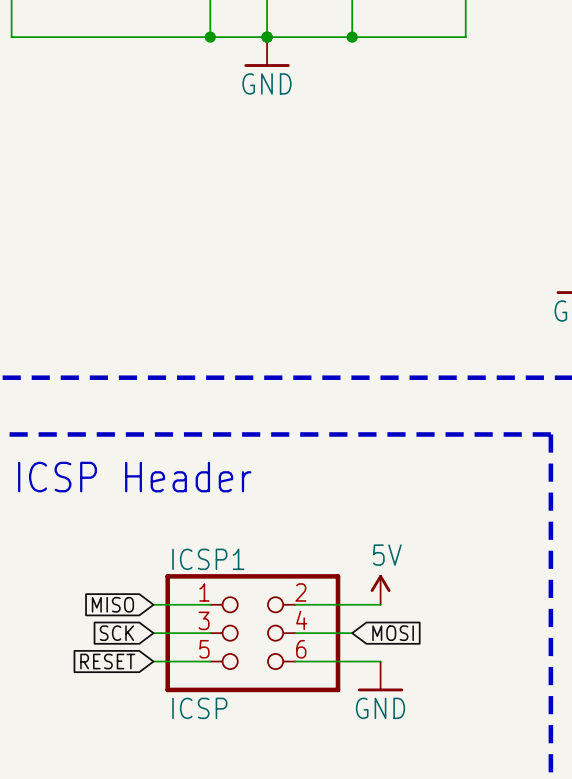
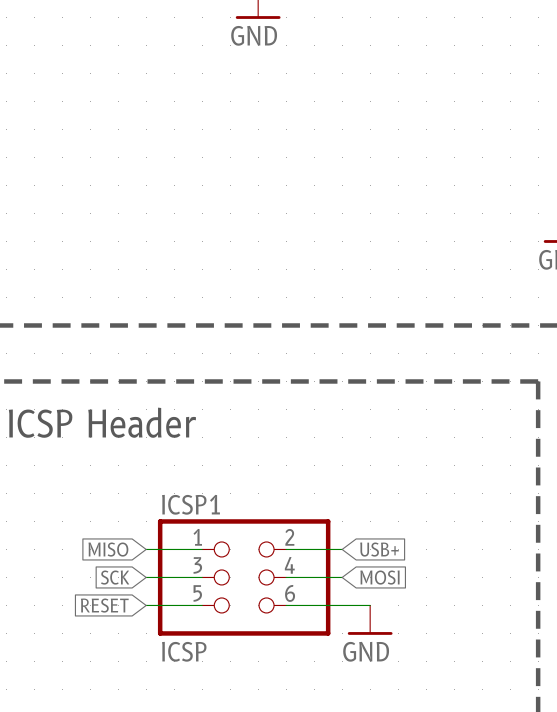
power symbol: 5V (380, 589) -> none
wire: (352, 604) (380, 604) -> none
global label: none -> USB+ (379, 549)

